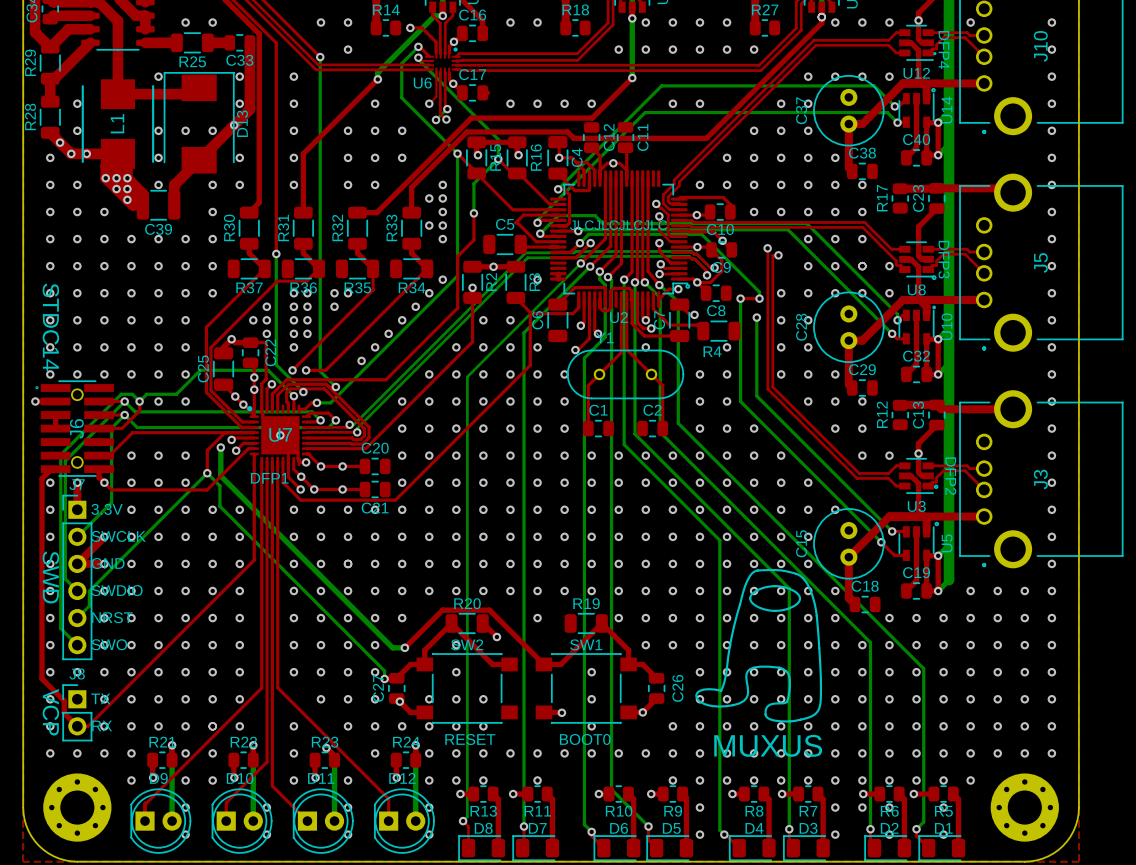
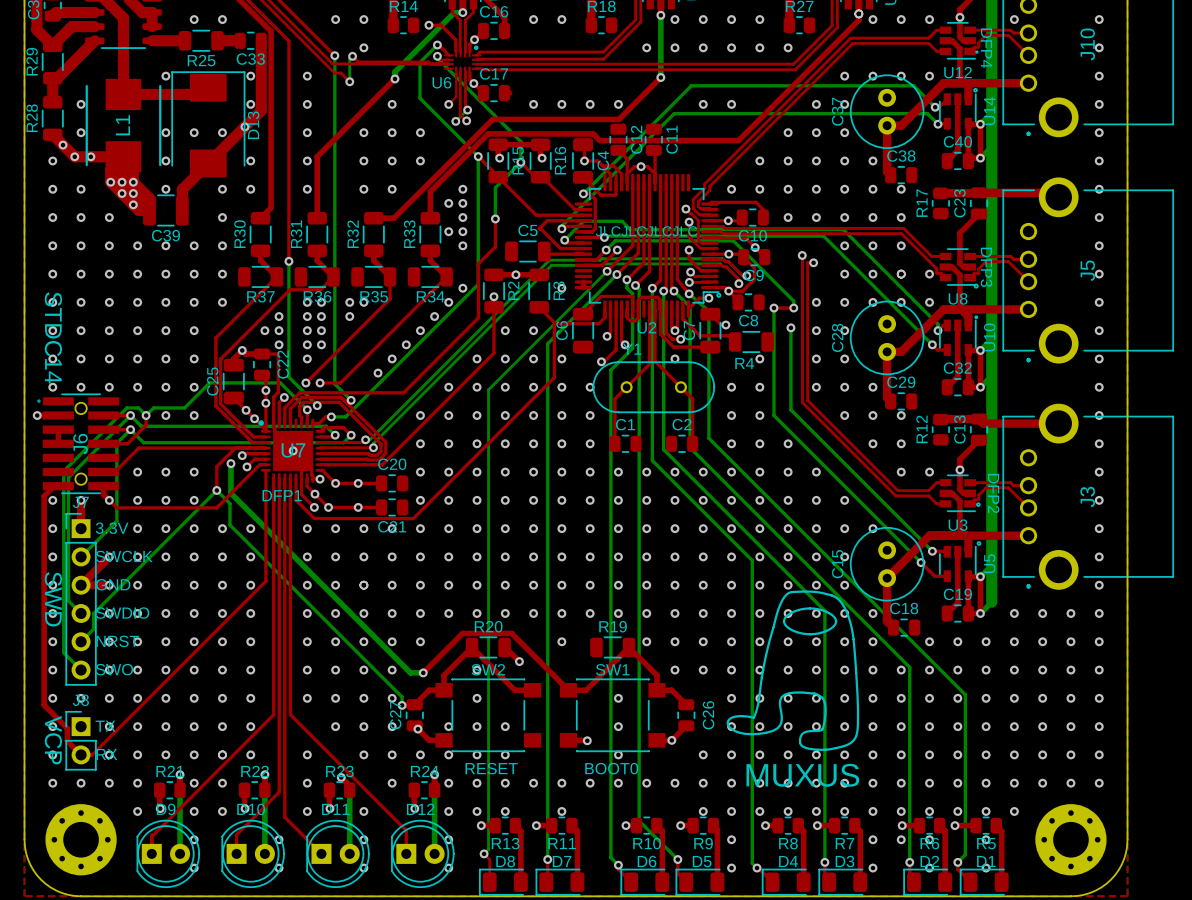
top track: none -> (352, 56) (358, 61) (428, 61) (430, 64) (448, 64)
bottom track: none -> (352, 56) (349, 59) (349, 81)
via: none -> (352, 56)
top track: (429, 69) (316, 69) -> (349, 81) (341, 73) (334, 73) (330, 69)
via: none -> (349, 81)

